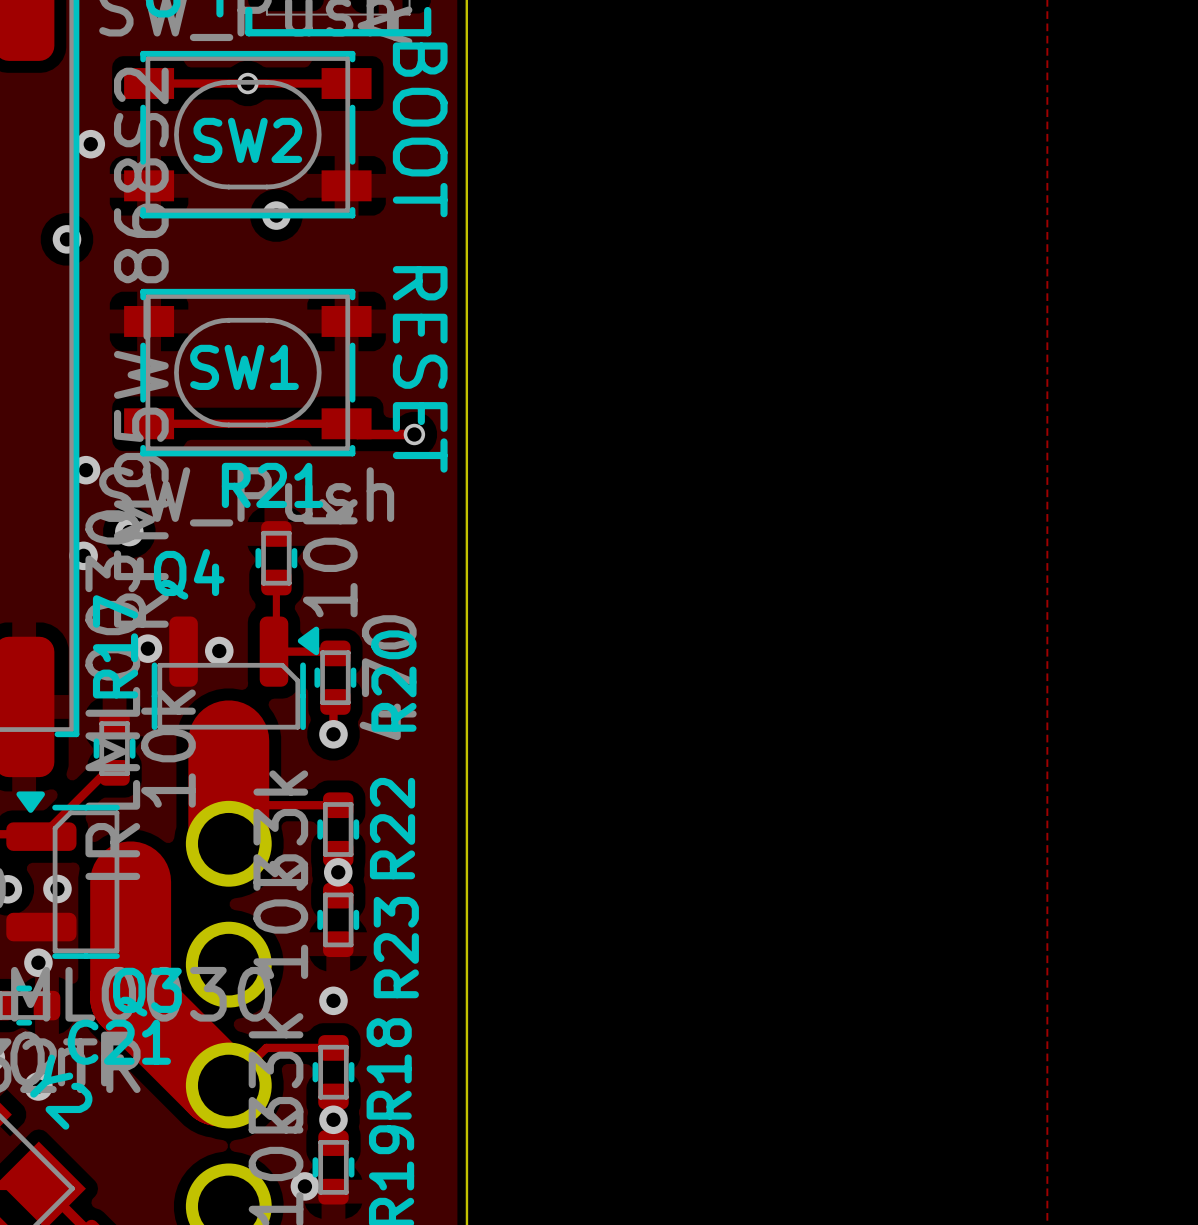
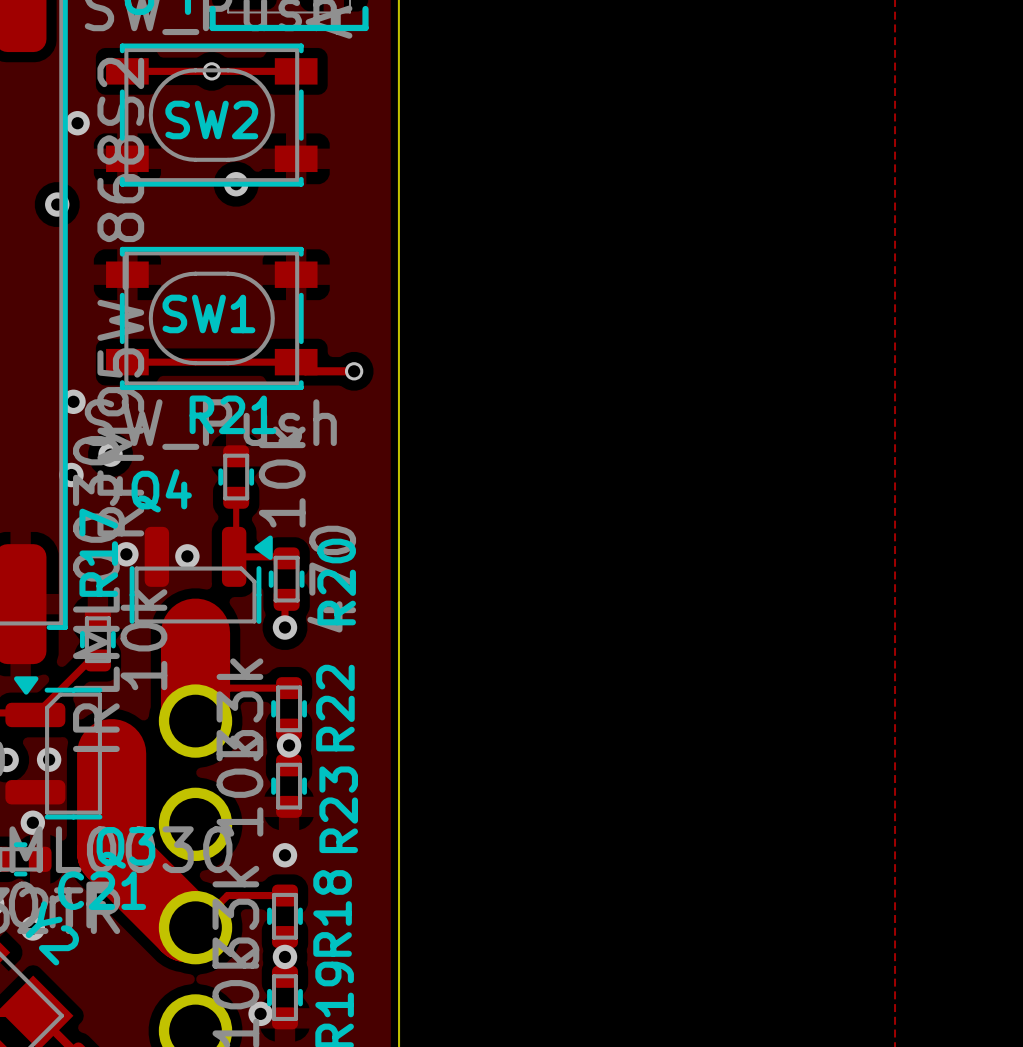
text: BOOT (420, 129) -> none
text: RESET (420, 369) -> none

